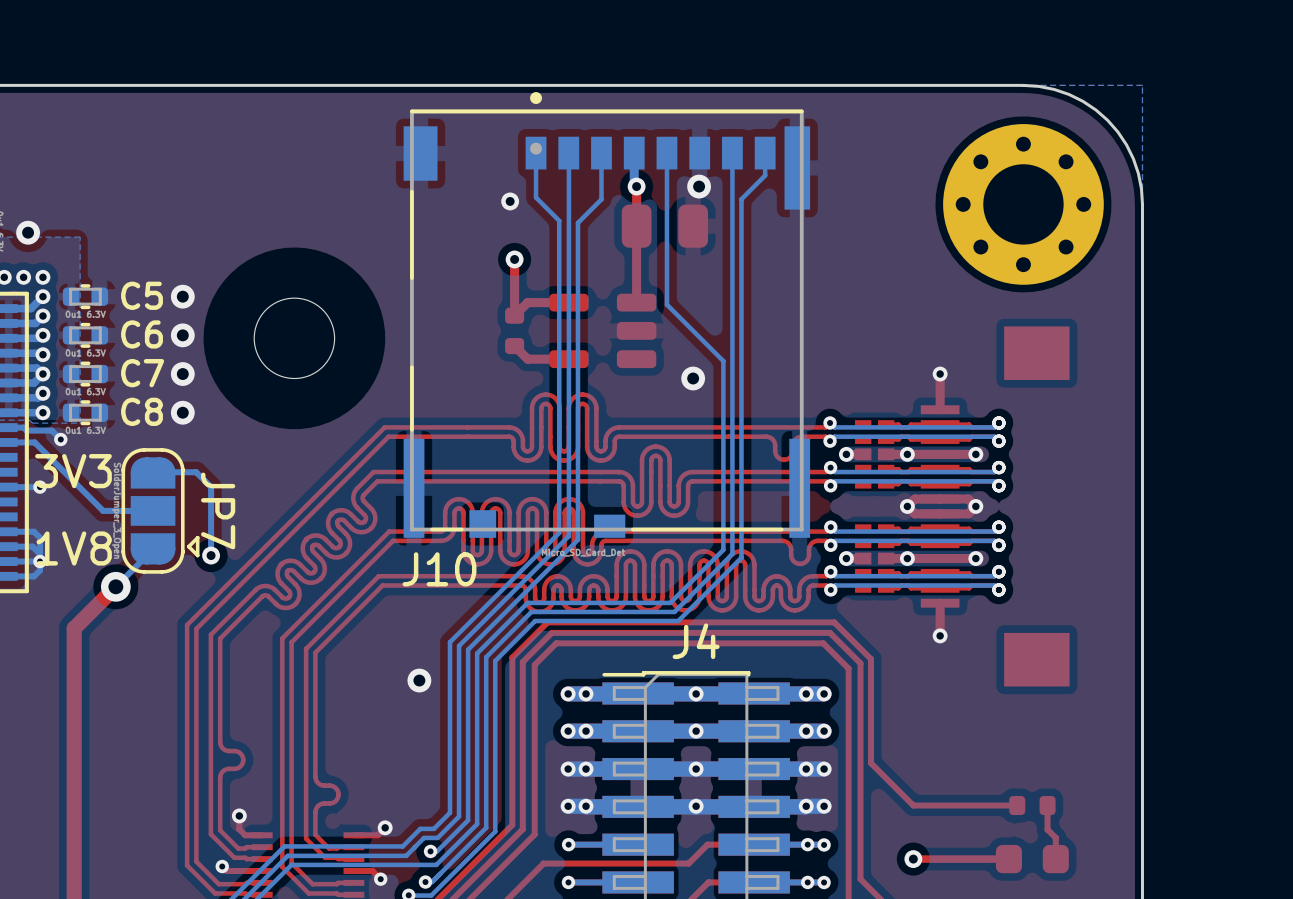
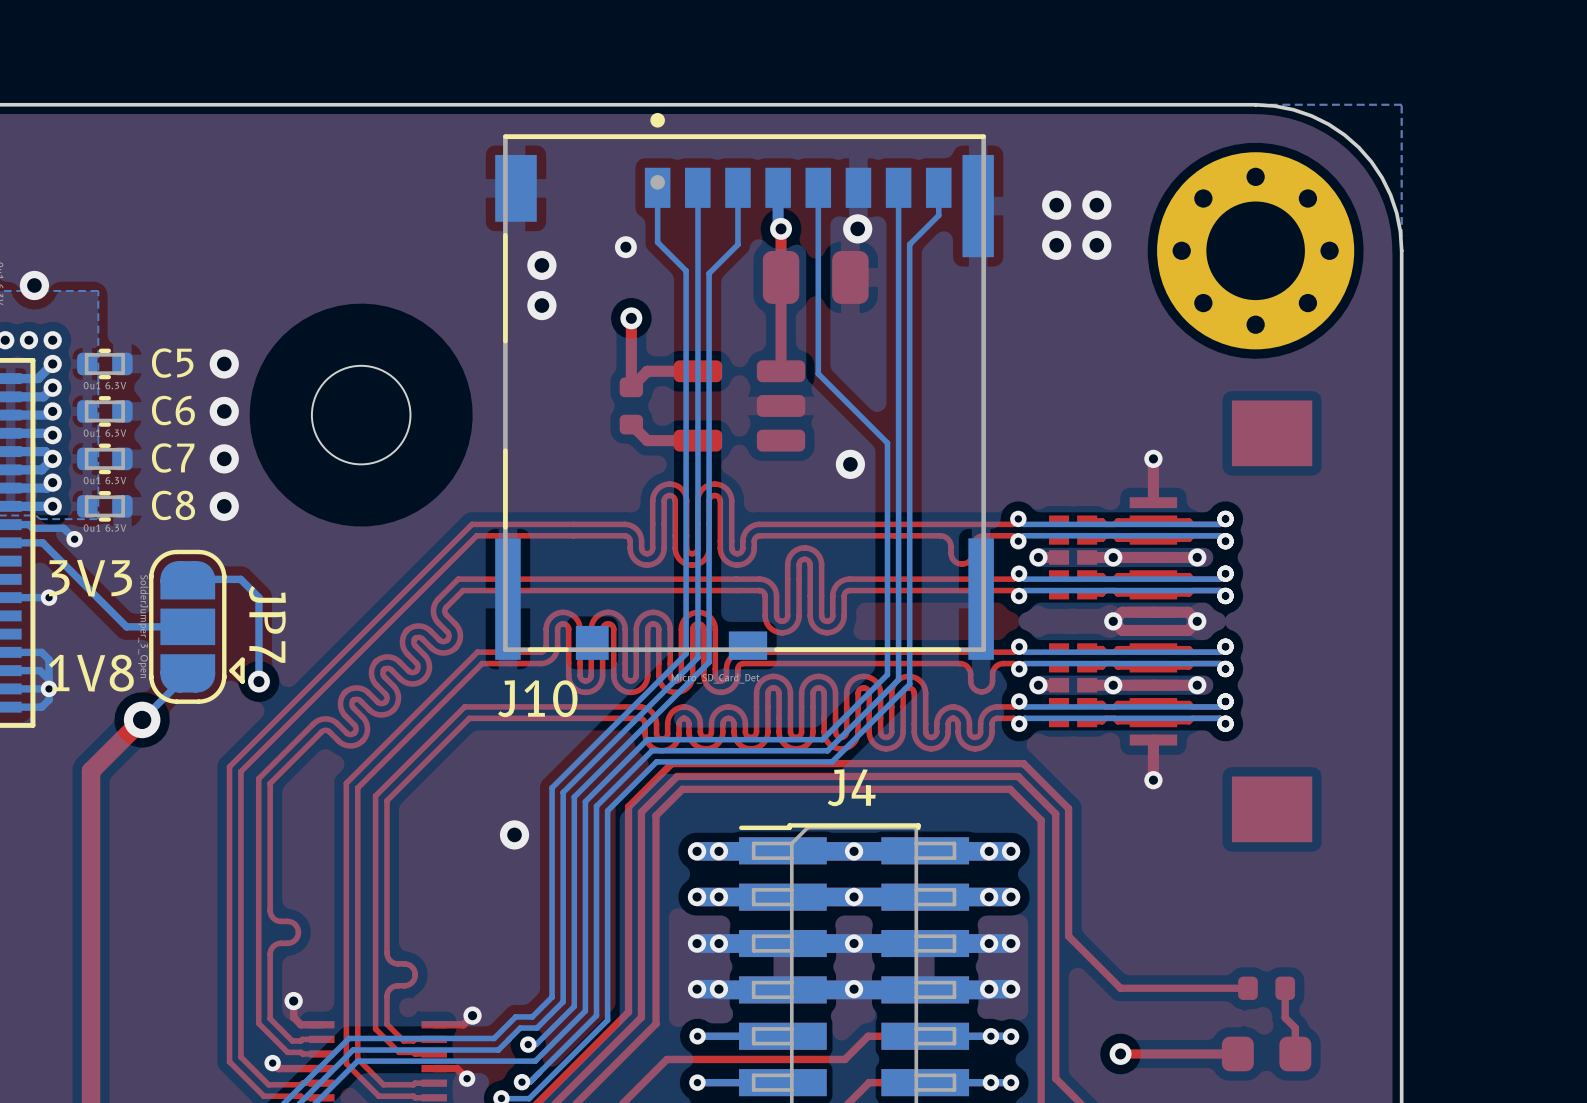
via: none -> (1056, 205)
via: none -> (1096, 205)
via: none -> (1056, 245)
via: none -> (1096, 245)
via: none -> (541, 265)
via: none -> (541, 305)

